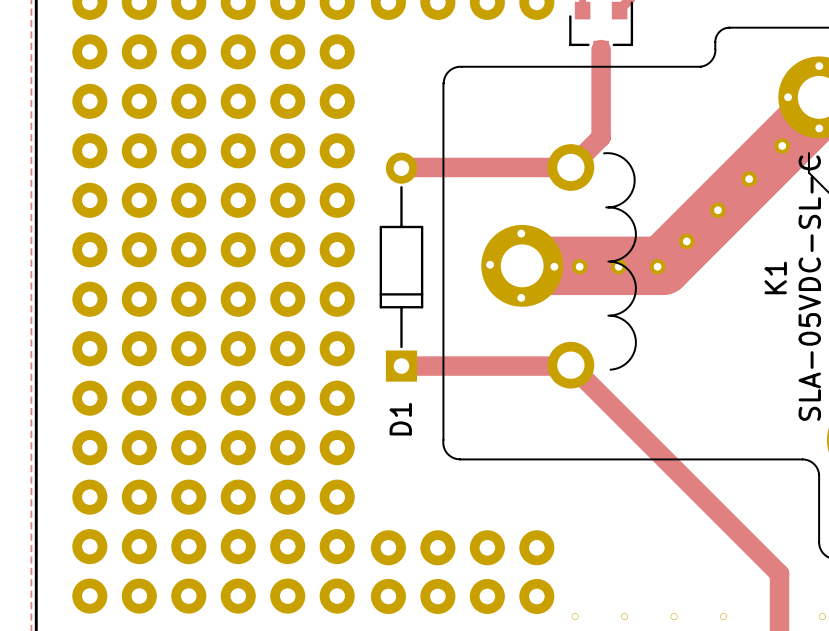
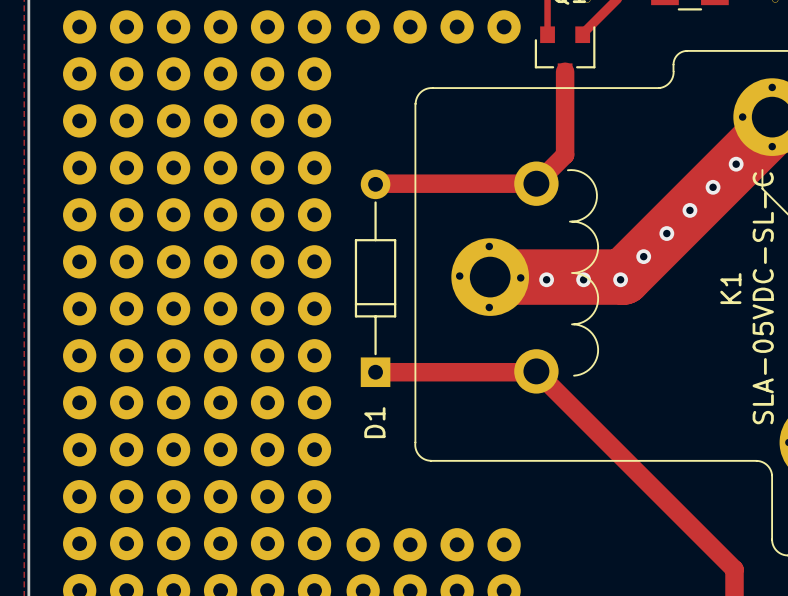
part: (782, 145) -> none
via: none -> (736, 164)
via: none -> (713, 187)
part: (749, 179) -> none
via: none -> (689, 210)
part: (717, 210) -> none
via: none -> (666, 233)
part: (686, 241) -> none
via: none -> (643, 256)
part: (579, 266) -> none
part: (618, 266) -> none
part: (657, 266) -> none
via: none -> (546, 279)
via: none -> (583, 279)
via: none -> (620, 279)

